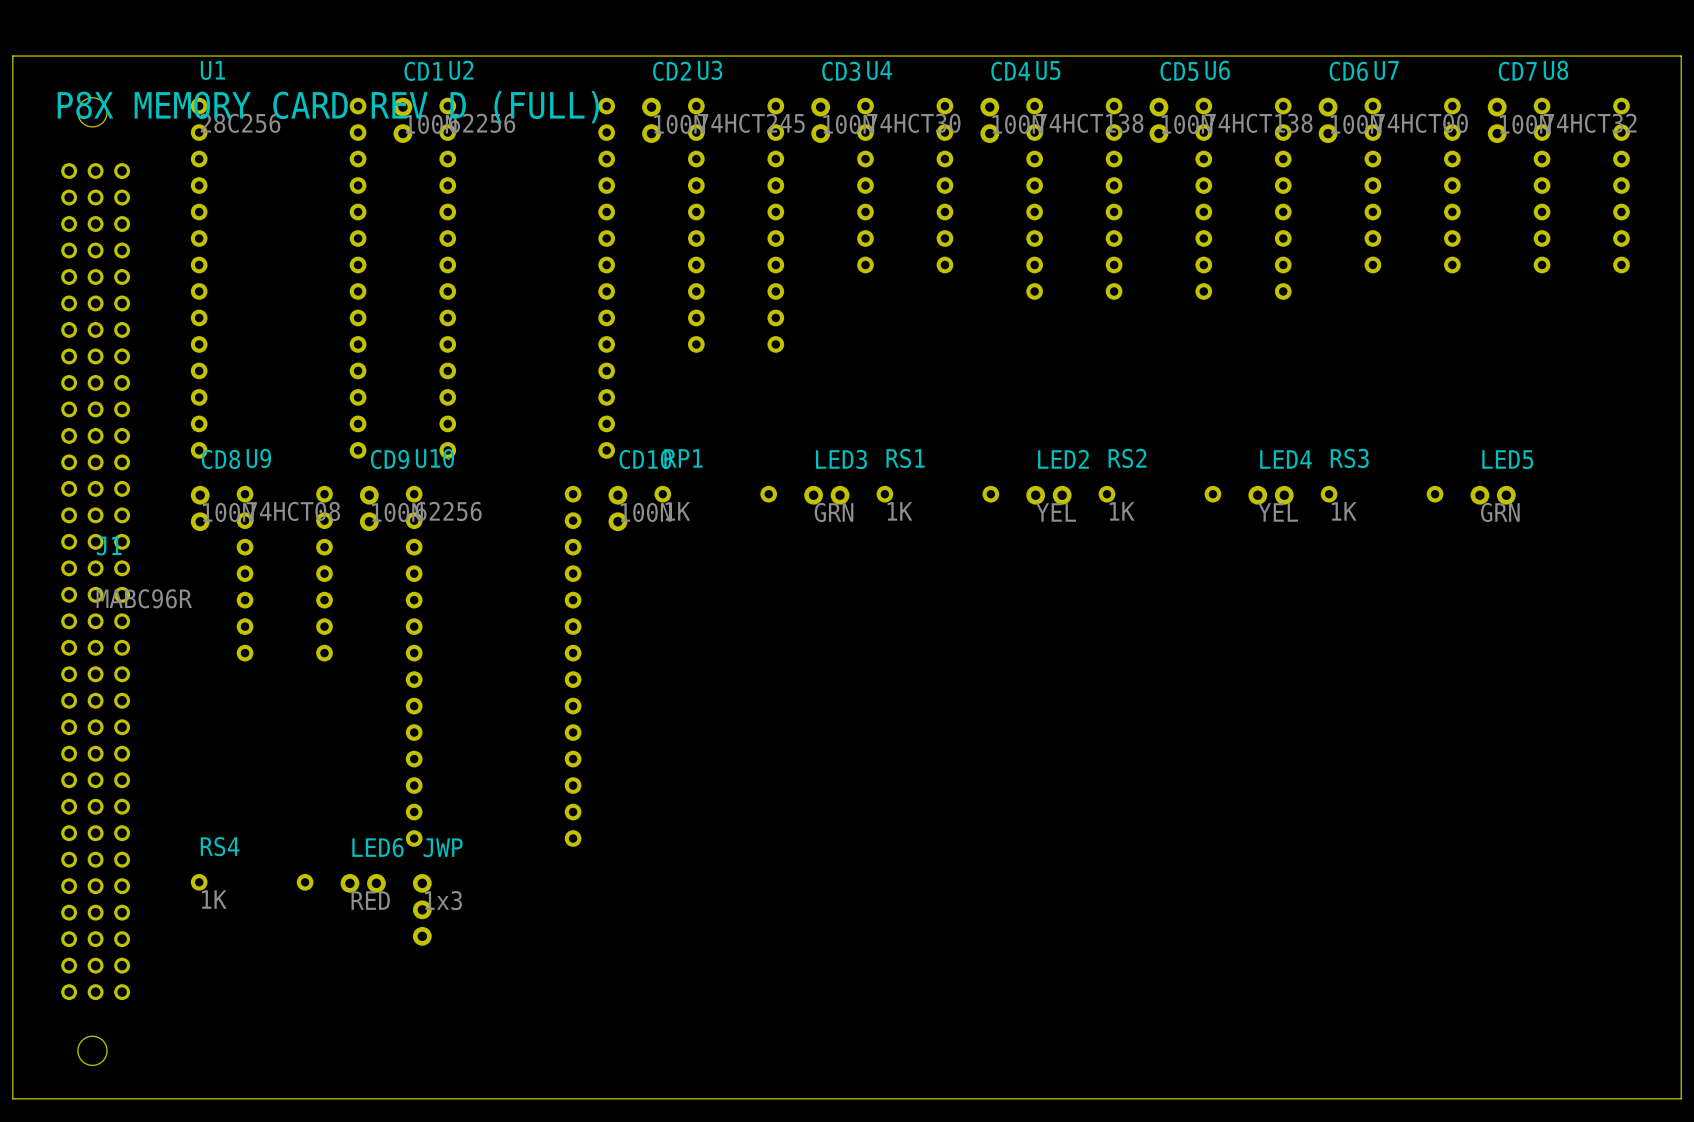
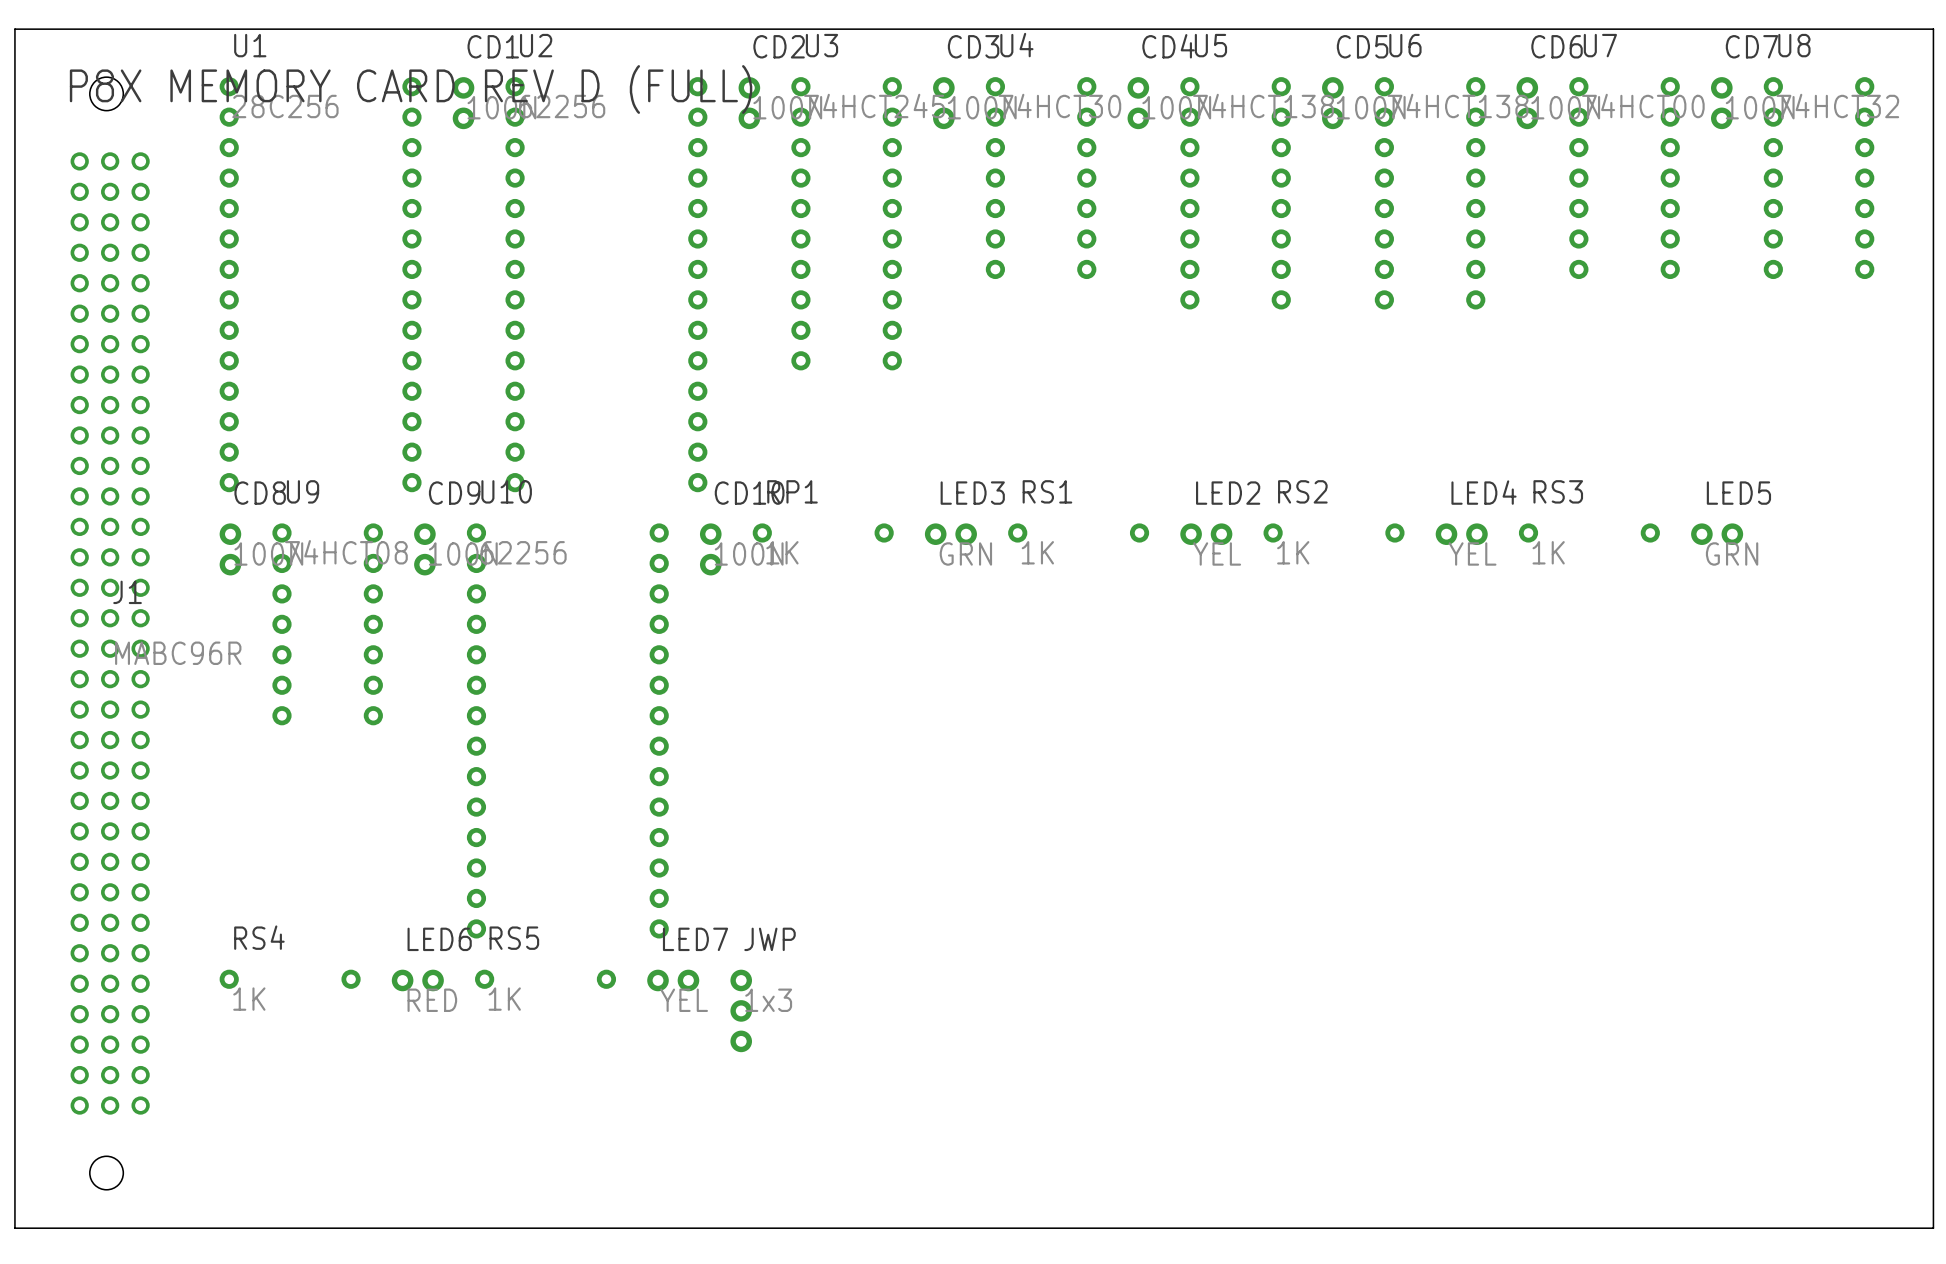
RS5: none -> 1K (545, 979)
LED7: none -> YEL (673, 980)
JWP position: (422, 909) -> (741, 1010)

